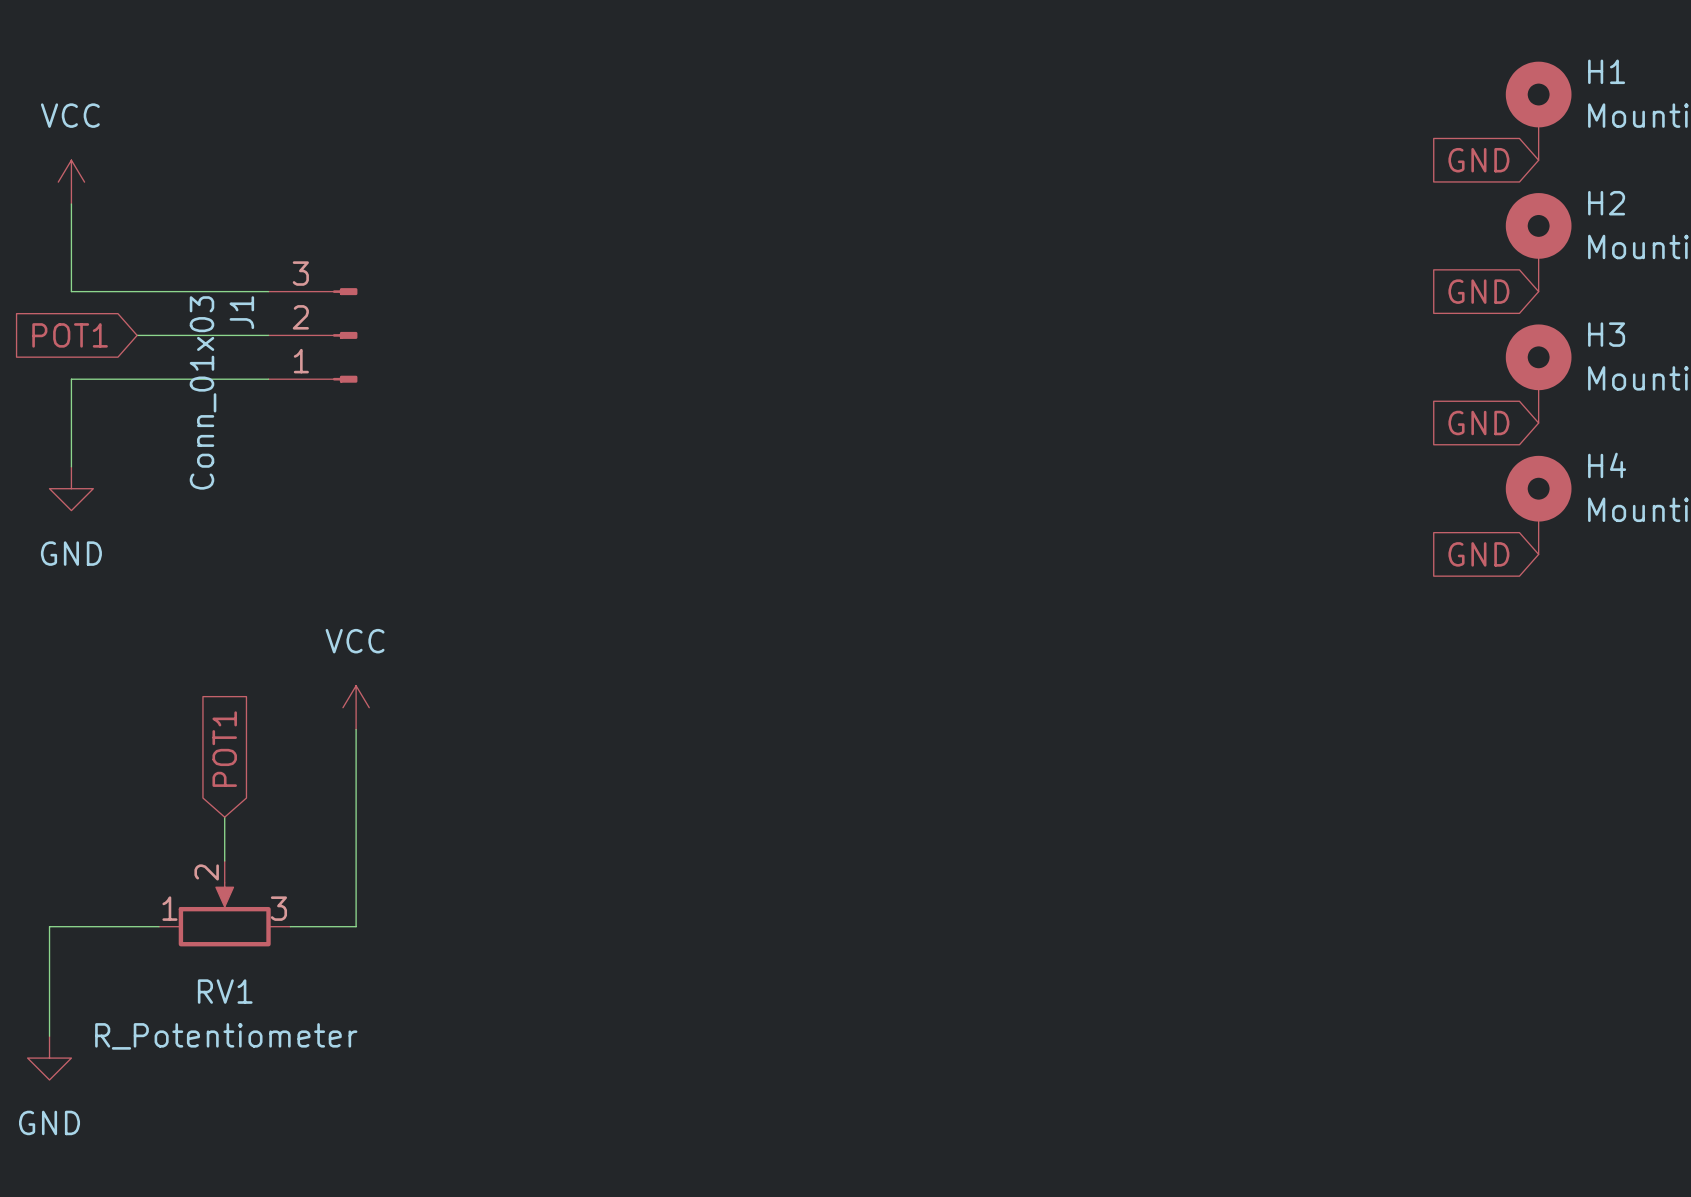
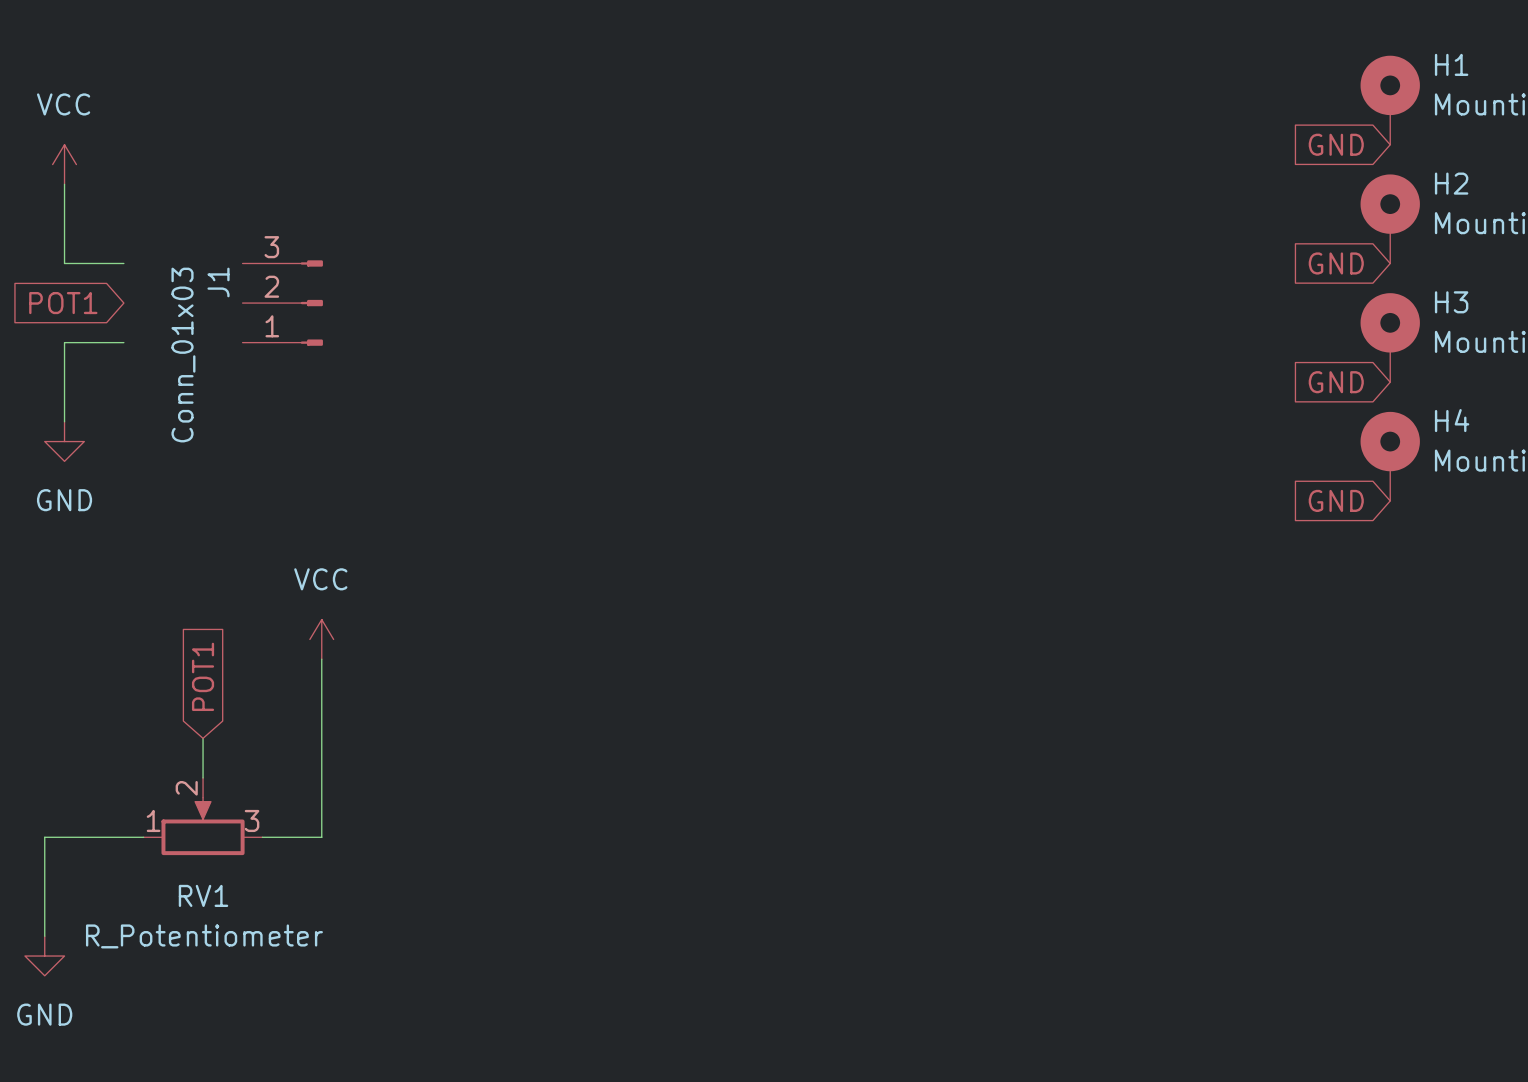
wire: (137, 291) (268, 291) -> none
wire: (137, 335) (268, 335) -> none
wire: (137, 379) (268, 379) -> none

